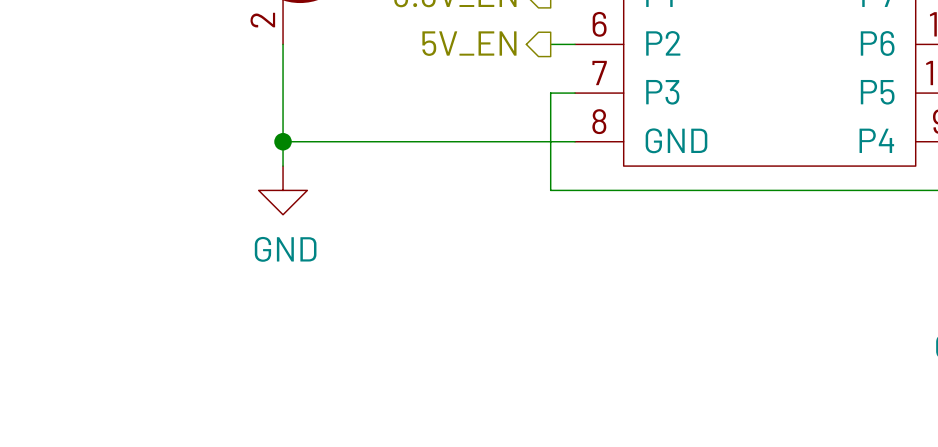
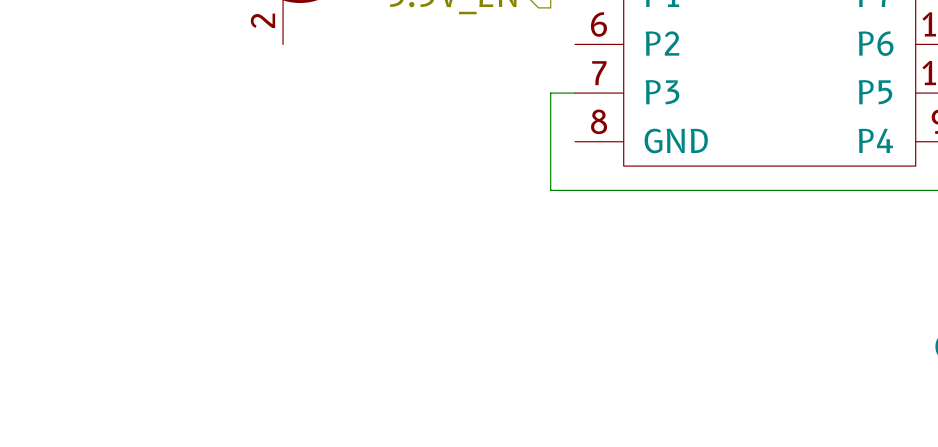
hierarchical label: 5V_EN (469, 43) -> none
wire: (283, 44) (283, 166) -> none
wire: (550, 44) (575, 44) -> none
wire: (283, 141) (575, 141) -> none
junction: (283, 141) -> none
power symbol: GND (283, 190) -> none

